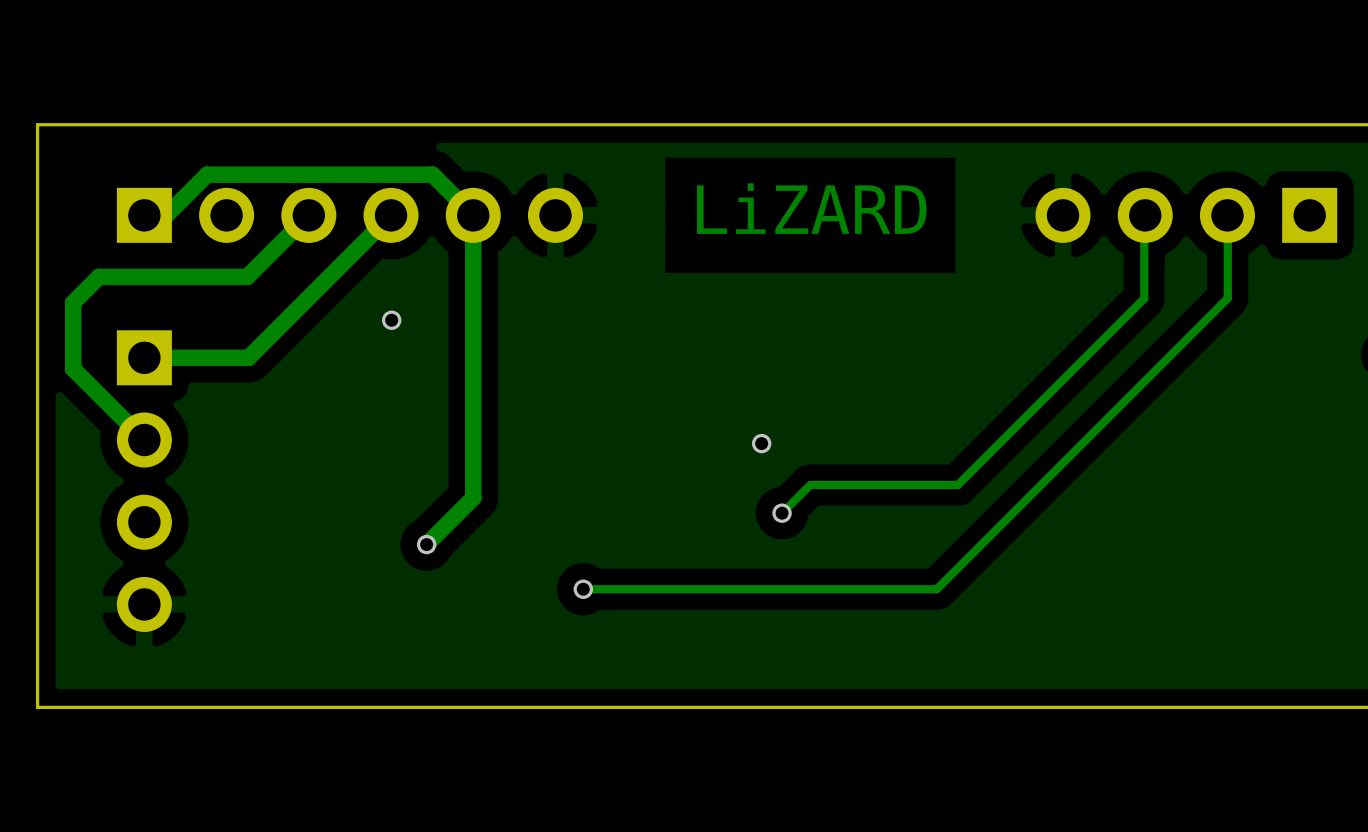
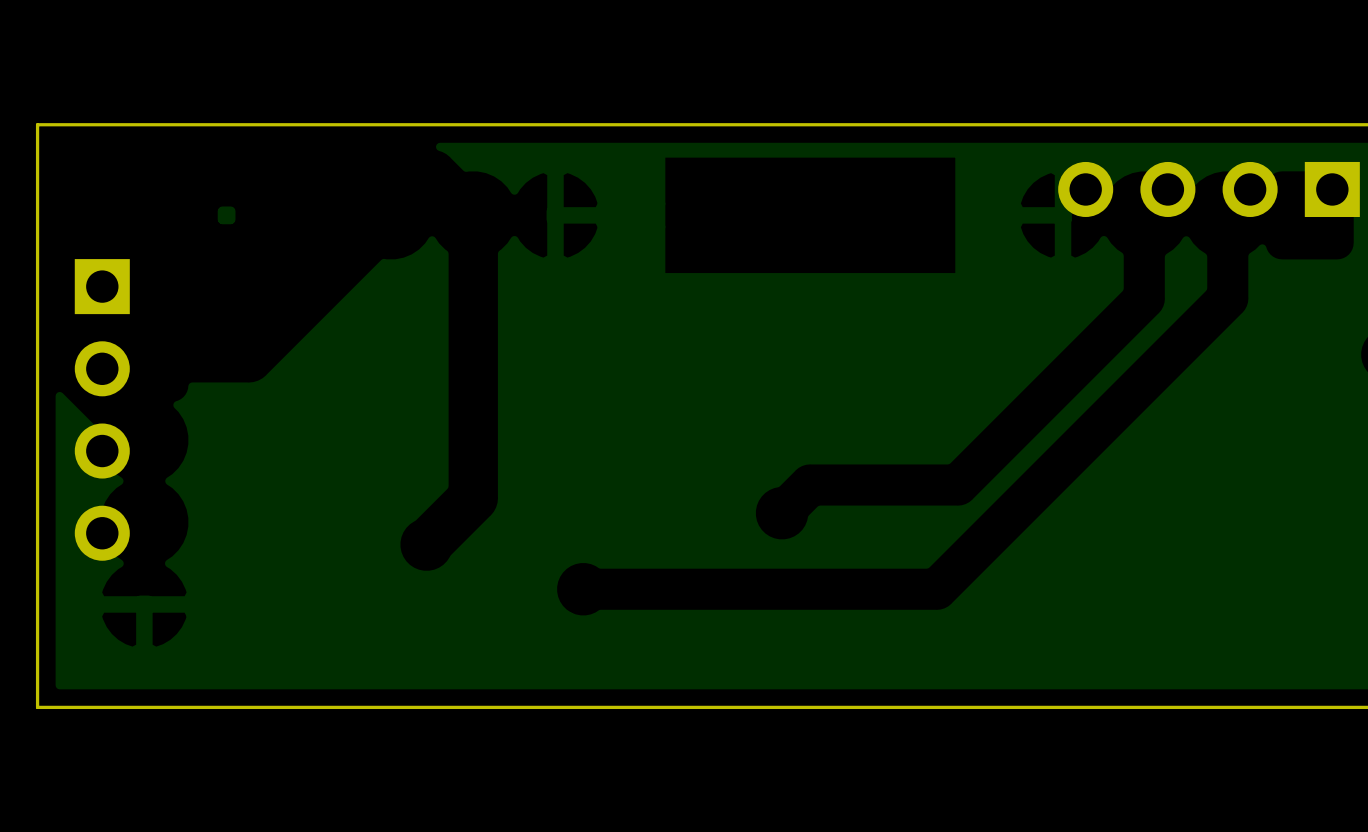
text: LiZARD (811, 208) -> none
track: (144, 215) (166, 215) (207, 174) (432, 174) (473, 215) (473, 497) (426, 544) -> none
part: (349, 215) -> none
track: (369, 215) (391, 215) (248, 357) (144, 357) -> none
track: (1145, 215) (1144, 298) (957, 485) (810, 485) (782, 513) -> none
part position: (1186, 215) -> (1209, 189)
track: (1227, 215) (1227, 298) (936, 589) (583, 589) -> none
track: (308, 229) (308, 215) (247, 276) (99, 276) (73, 302) (73, 368) (144, 440) -> none
via: (391, 320) -> none
via: (761, 443) -> none
part position: (144, 481) -> (102, 409)
via: (782, 513) -> none
via: (426, 544) -> none
via: (583, 589) -> none

